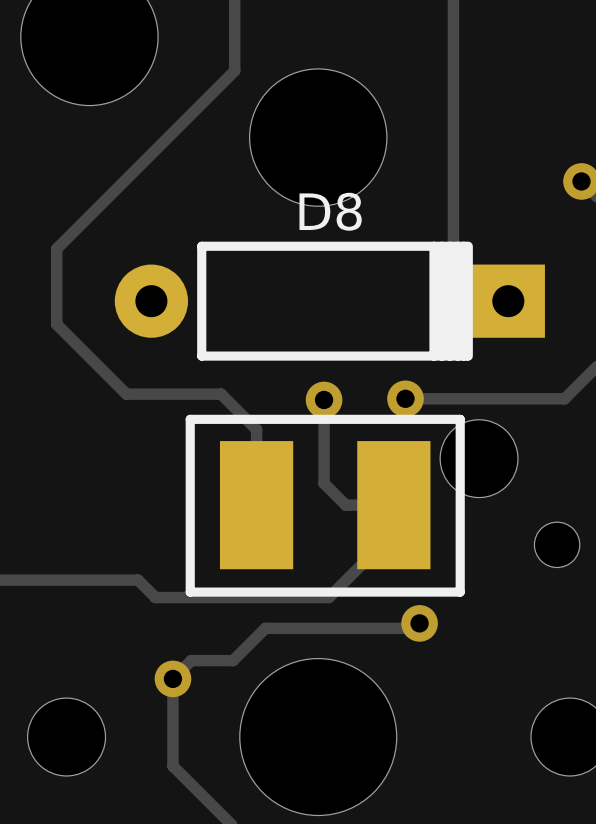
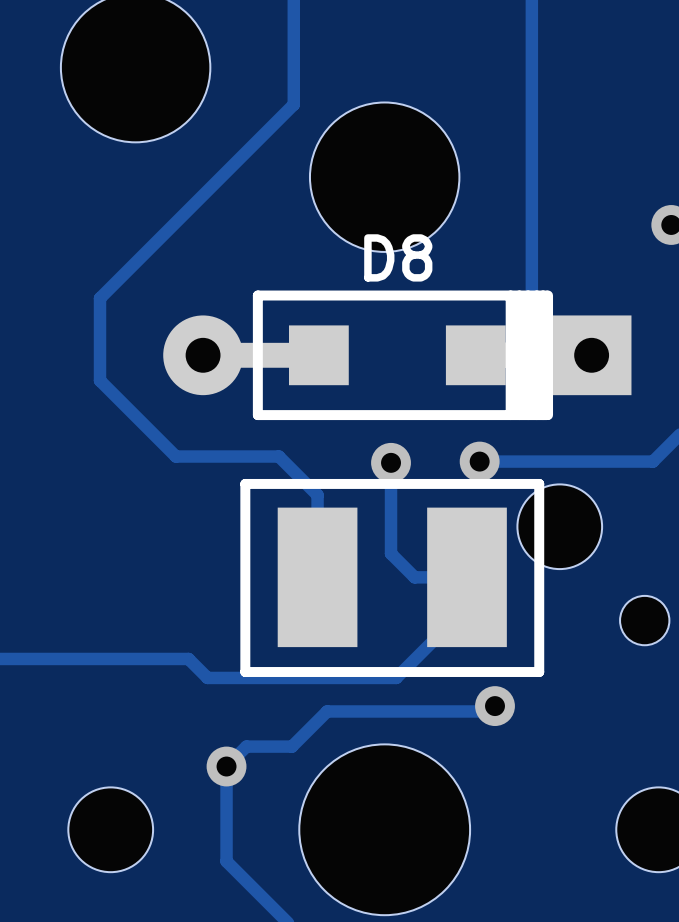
D8 footprint: [114, 241, 545, 361] -> [163, 290, 632, 421]

